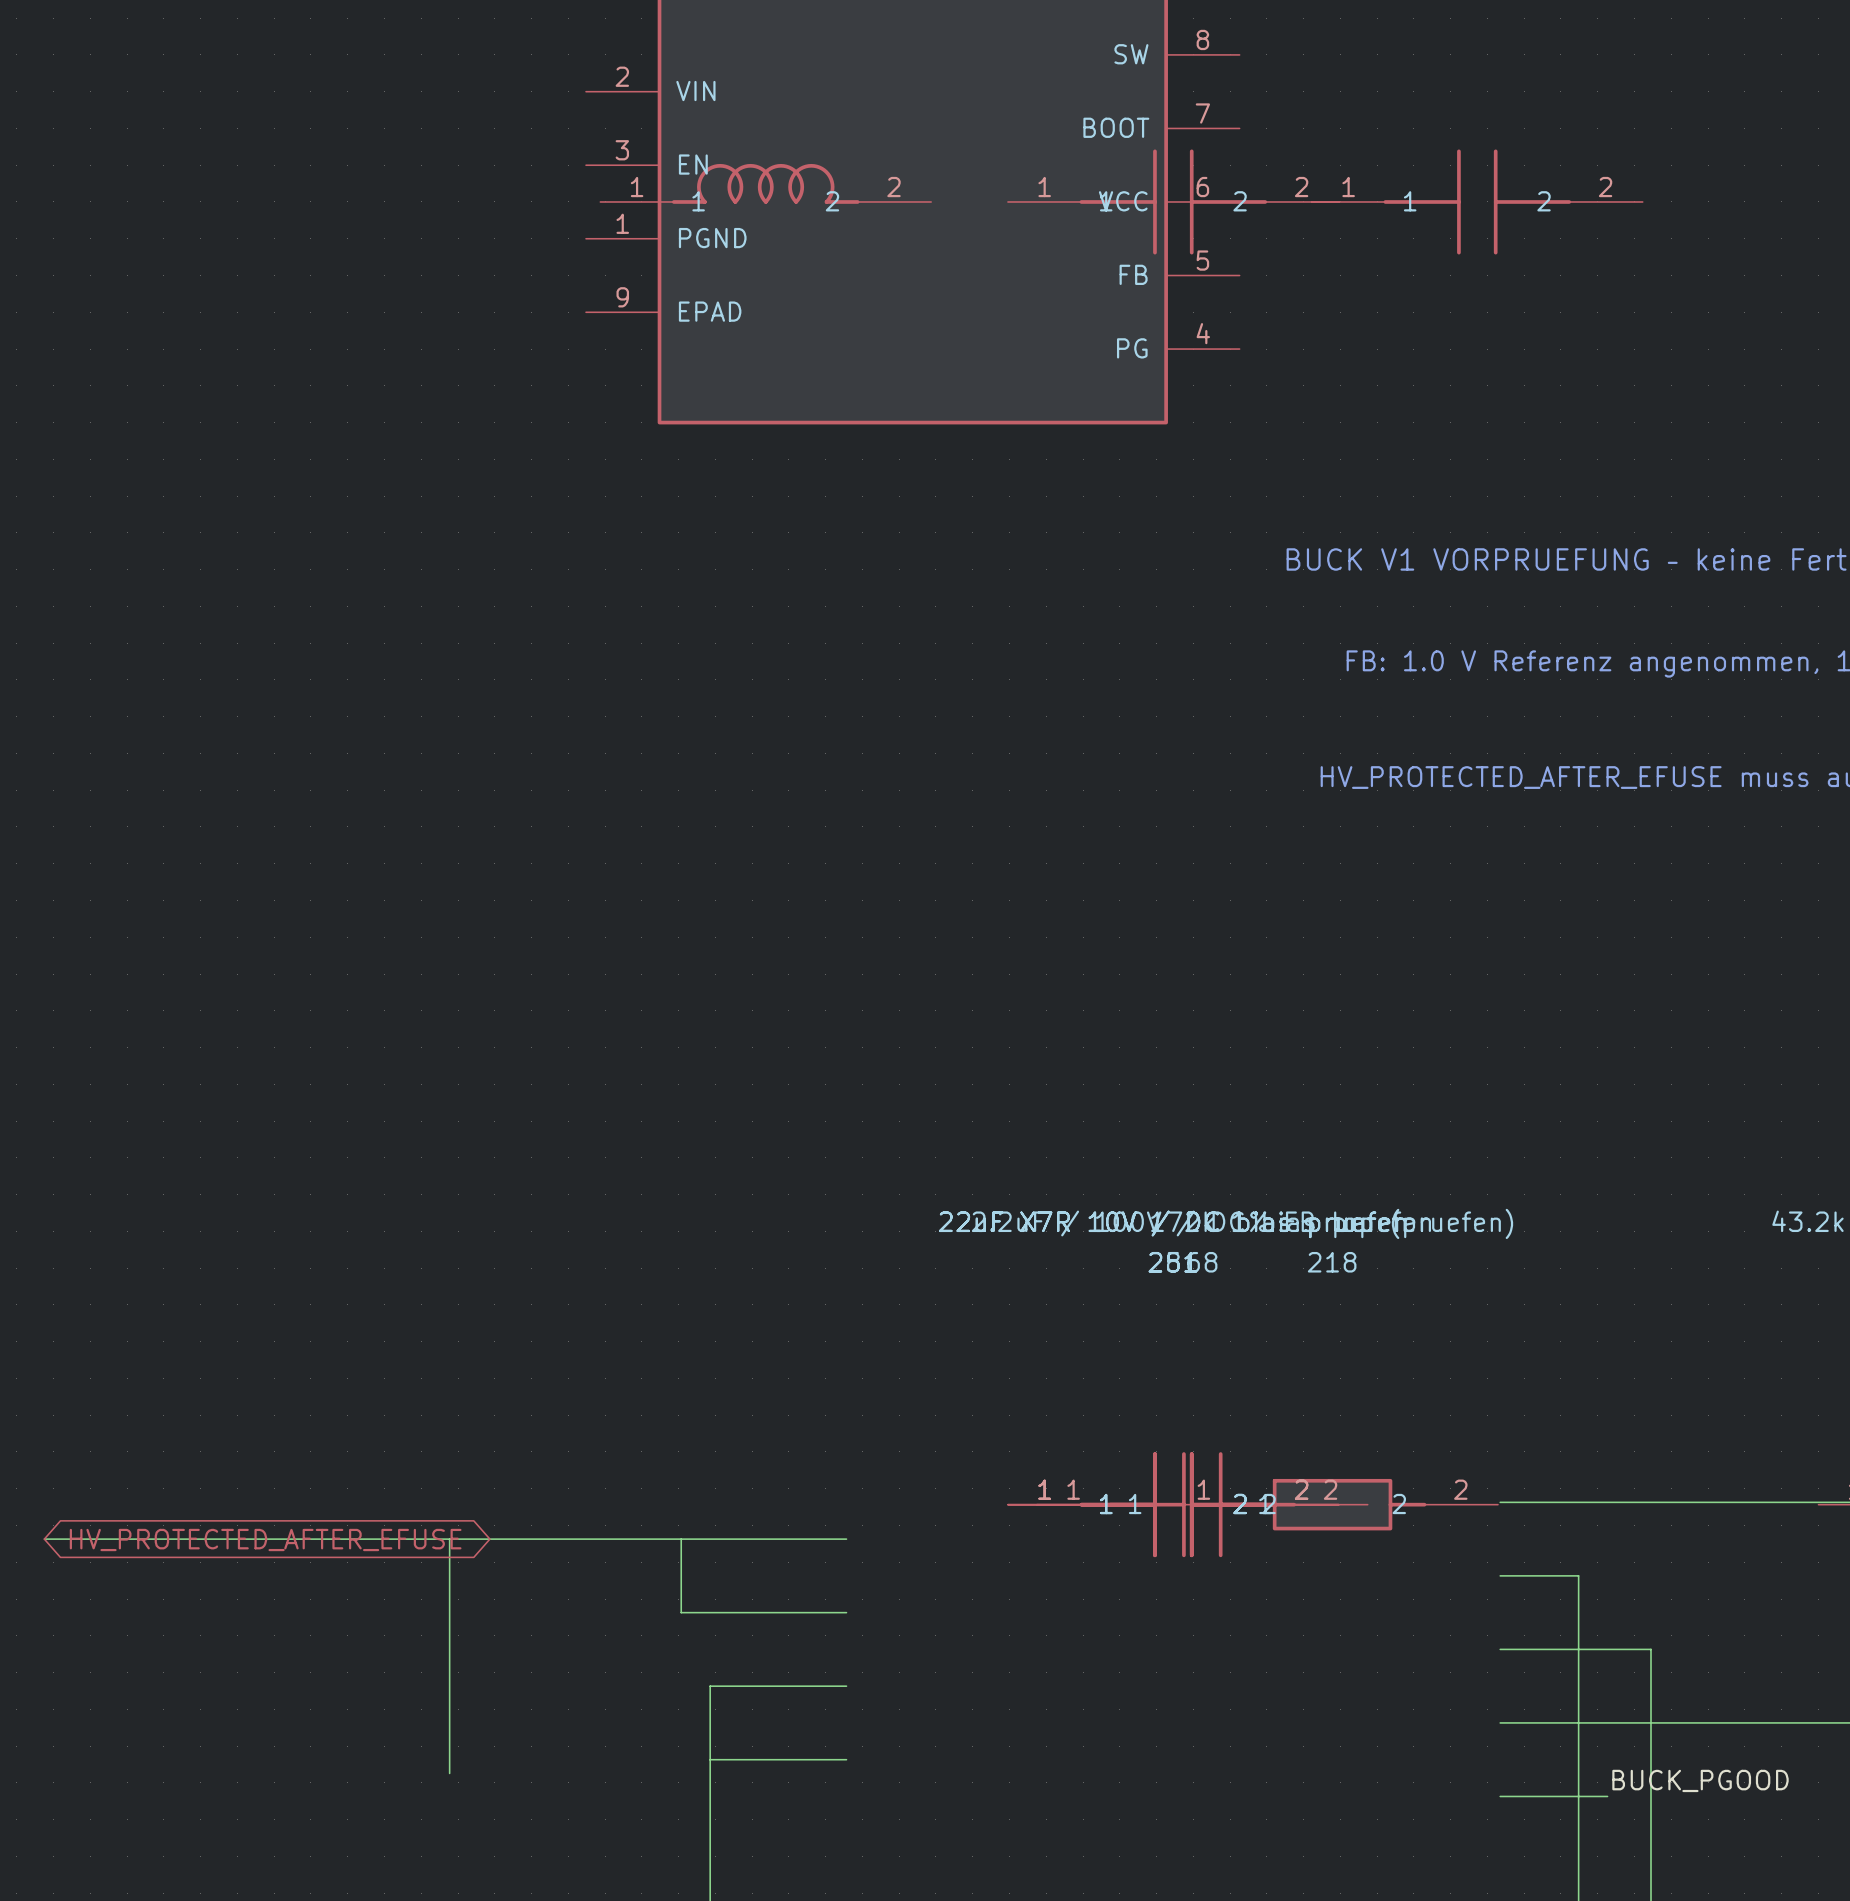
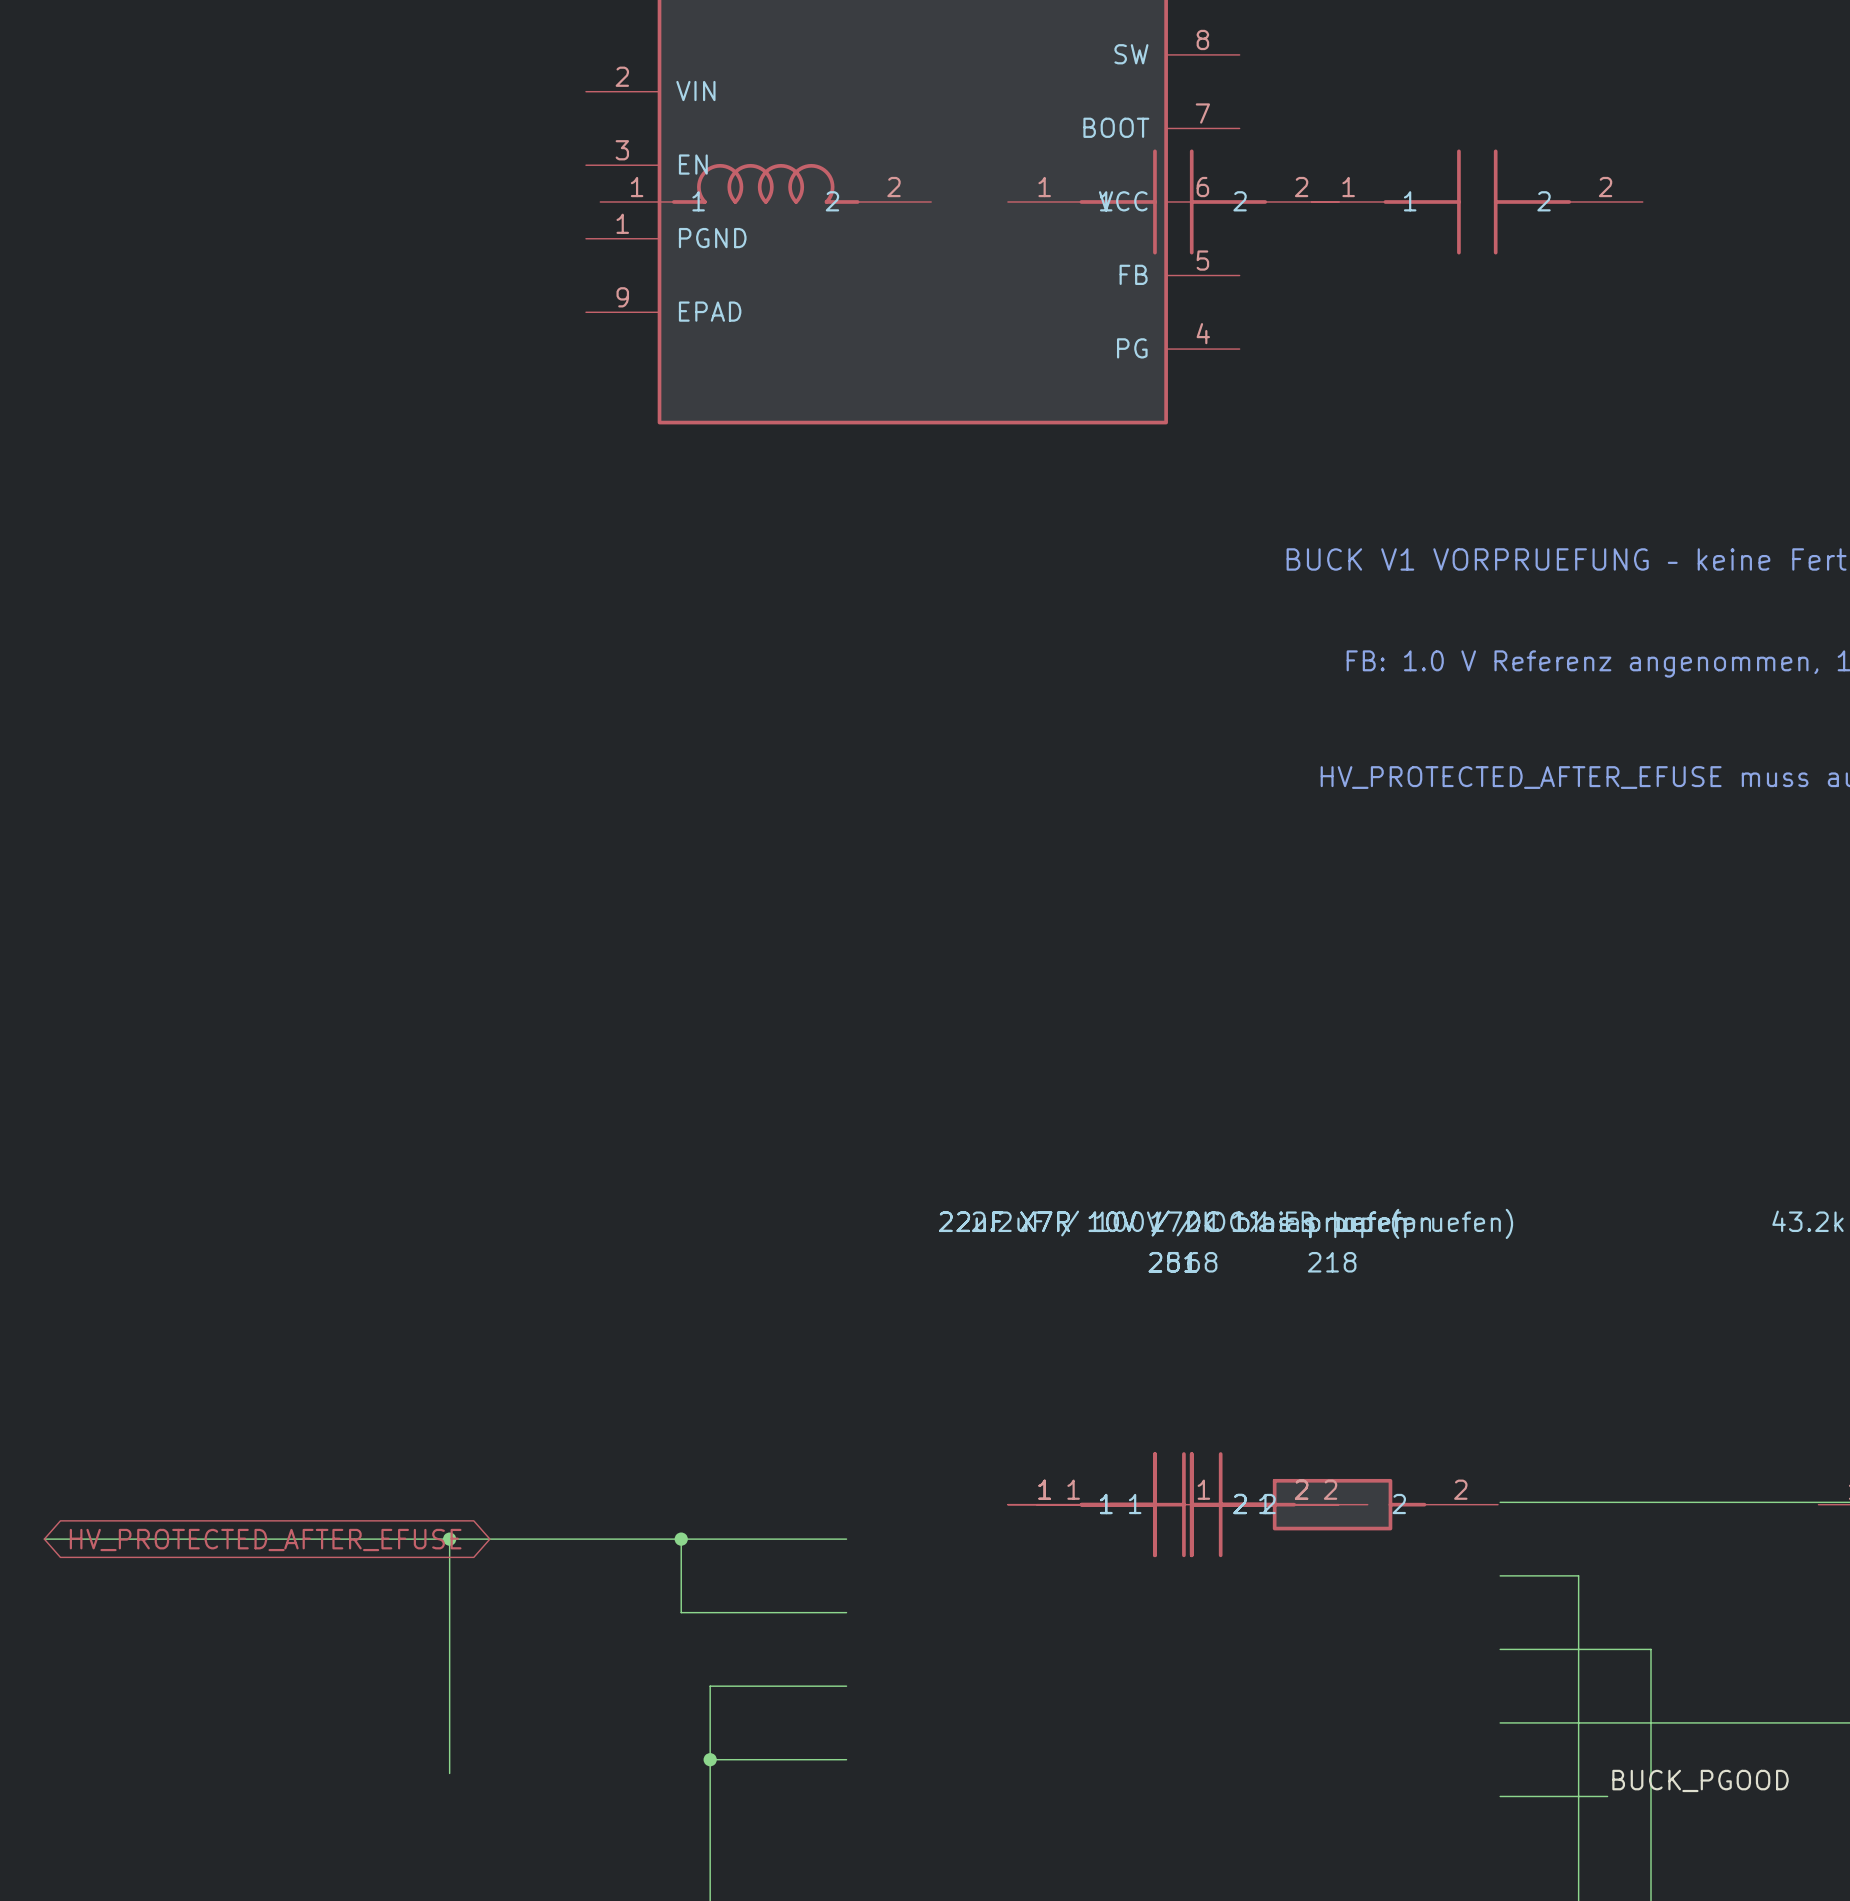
junction: none -> (449, 1539)
junction: none -> (681, 1539)
junction: none -> (710, 1759)

